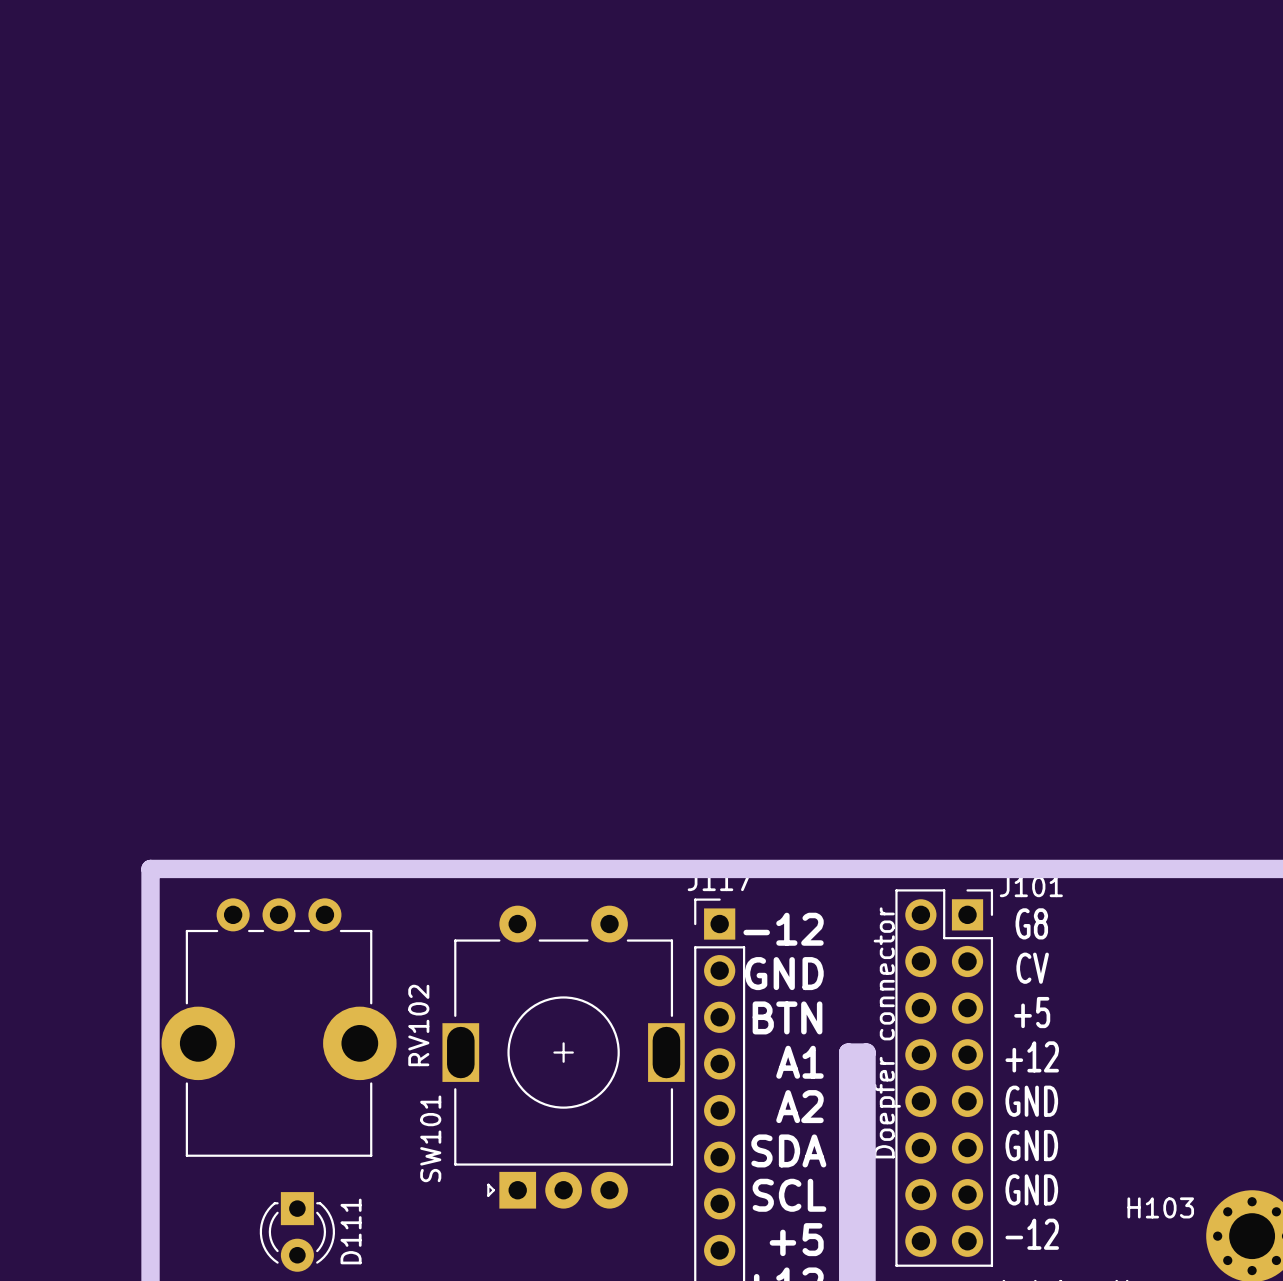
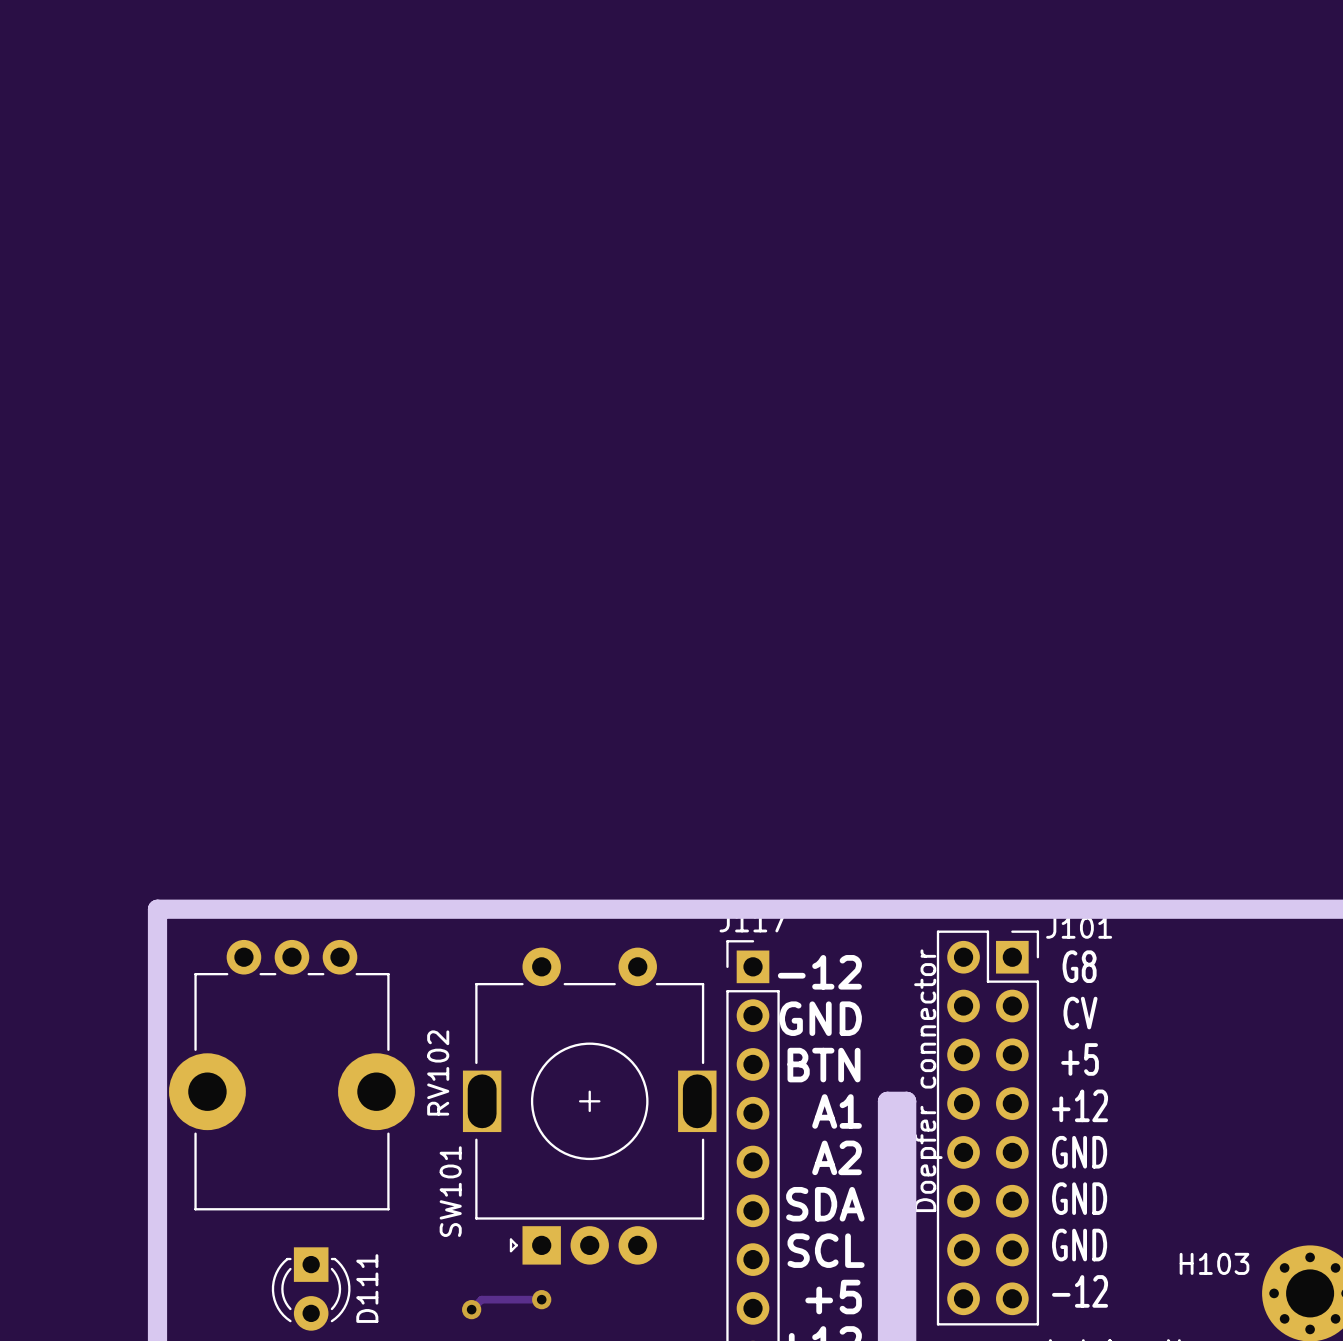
track: none -> (541, 1299) (481, 1299) (471, 1309)
via: none -> (541, 1299)
via: none -> (471, 1309)

